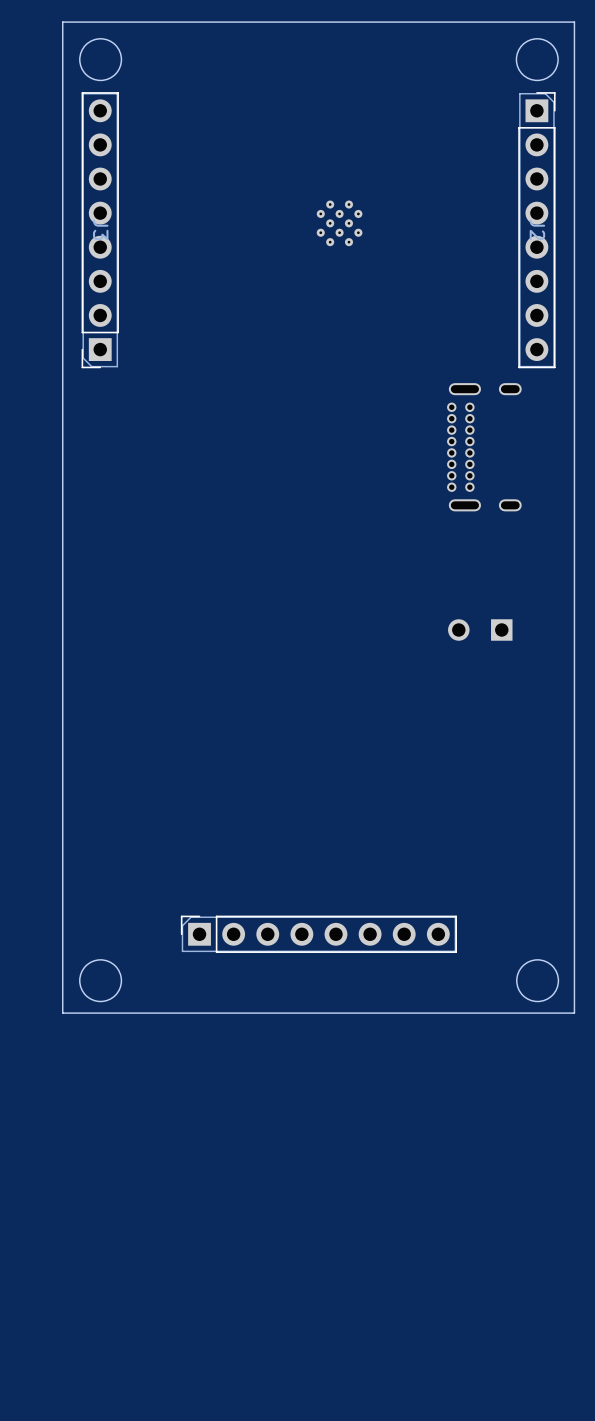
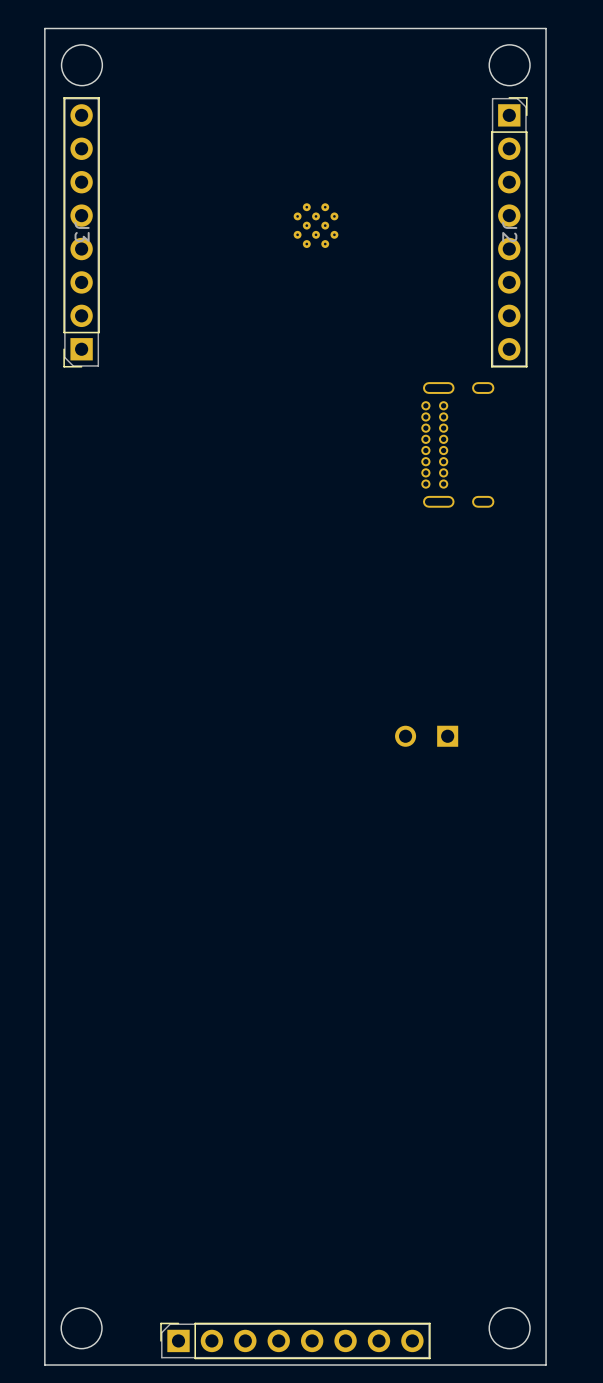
part position: (480, 629) -> (426, 736)
part: (318, 934) -> none
round board edge: [79, 959, 122, 1002] -> none
round board edge: [516, 959, 559, 1002] -> none
board edge: (574, 1013) (62, 1013) -> (546, 999) (546, 1365) (44, 1365) (44, 999)
round board edge: none -> [60, 1307, 103, 1349]
round board edge: none -> [488, 1307, 531, 1349]
part: none -> (295, 1340)

